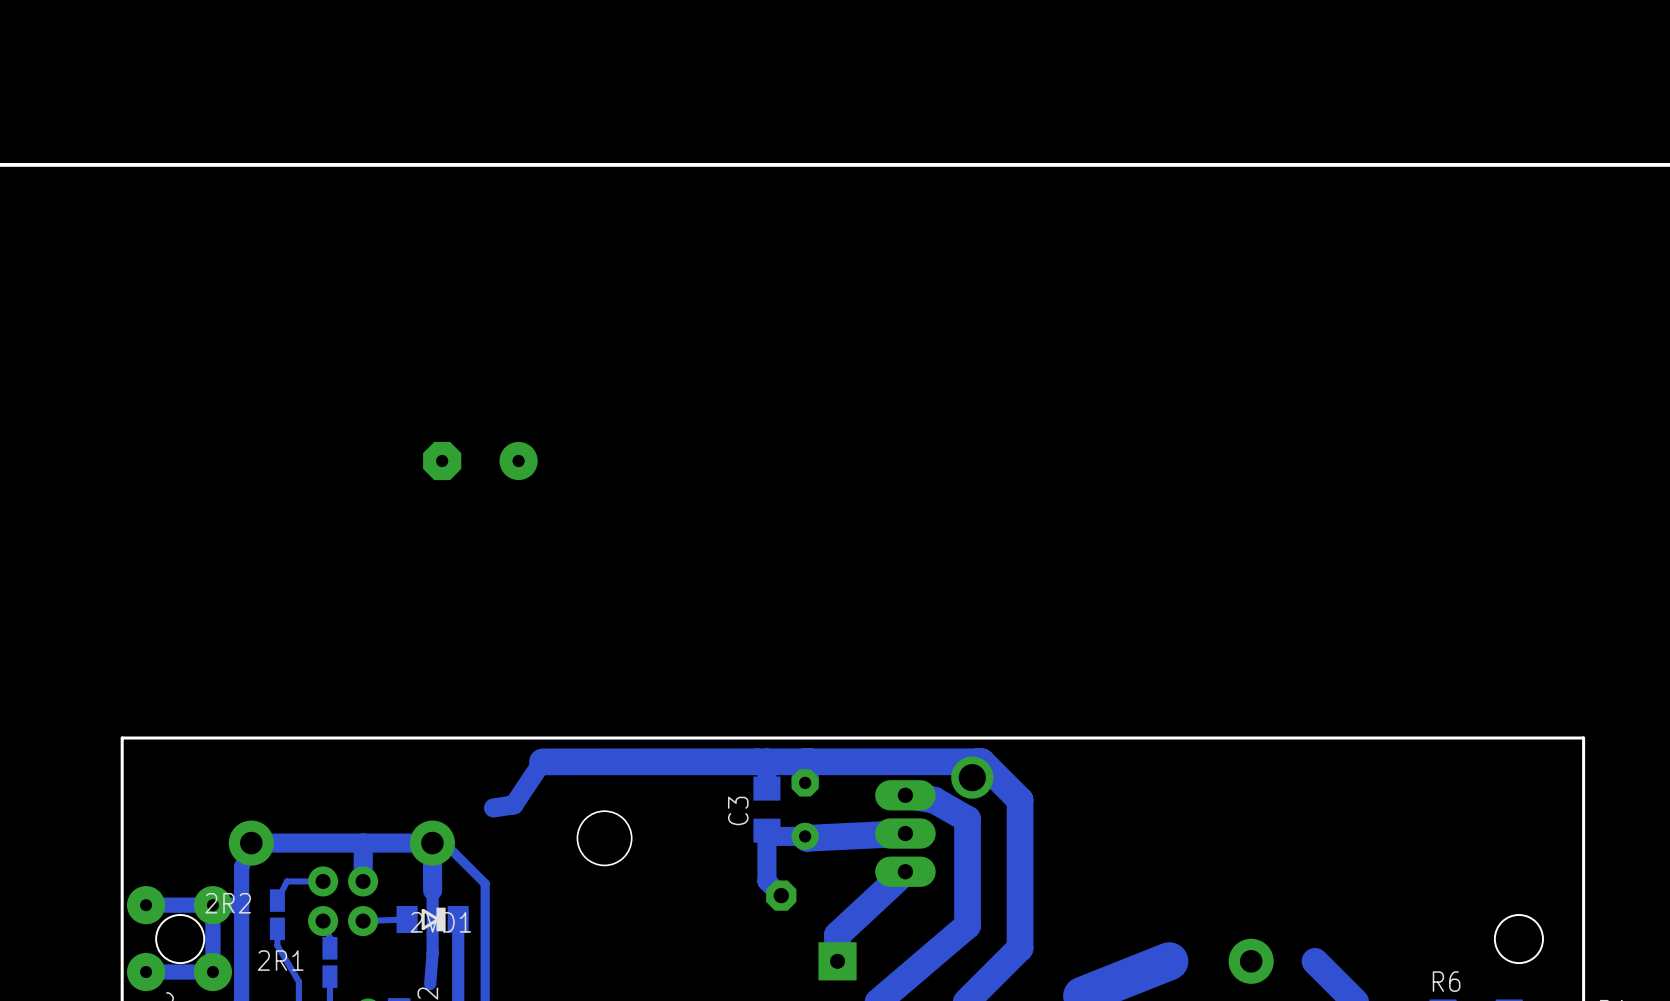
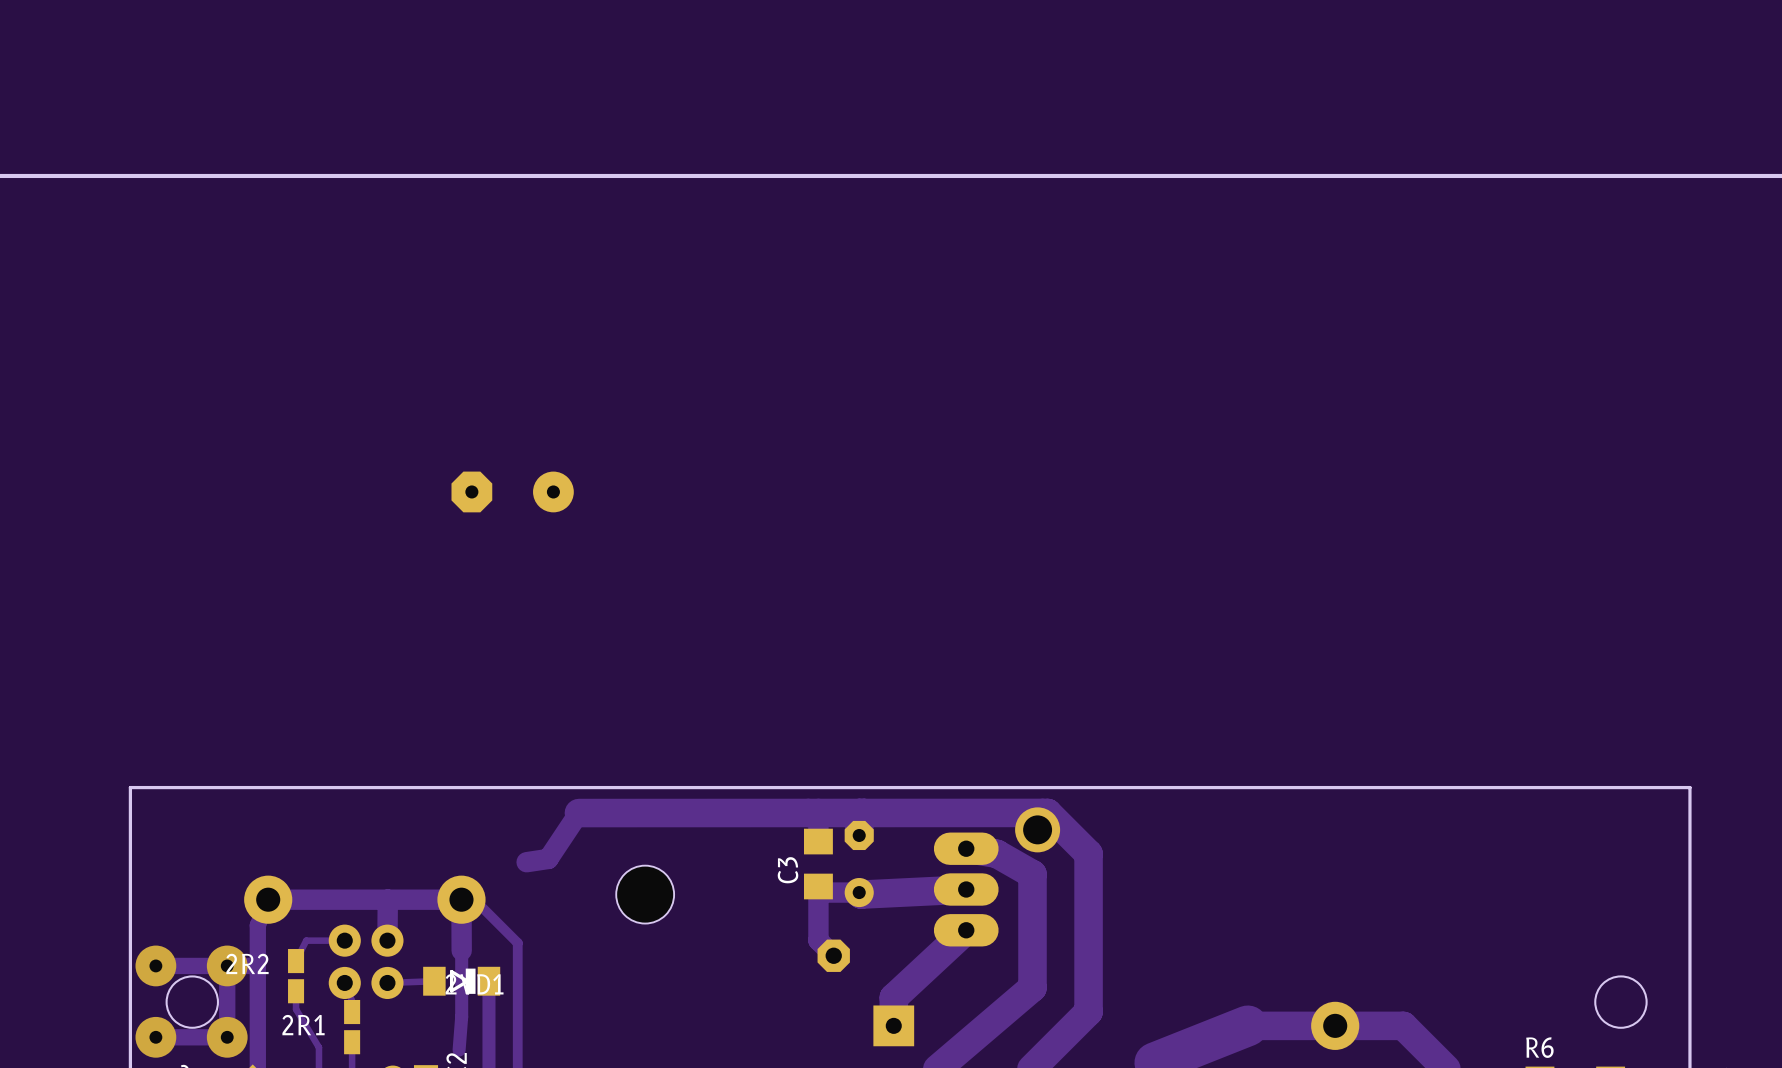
track: none -> (1403, 1025) (1247, 1025)

